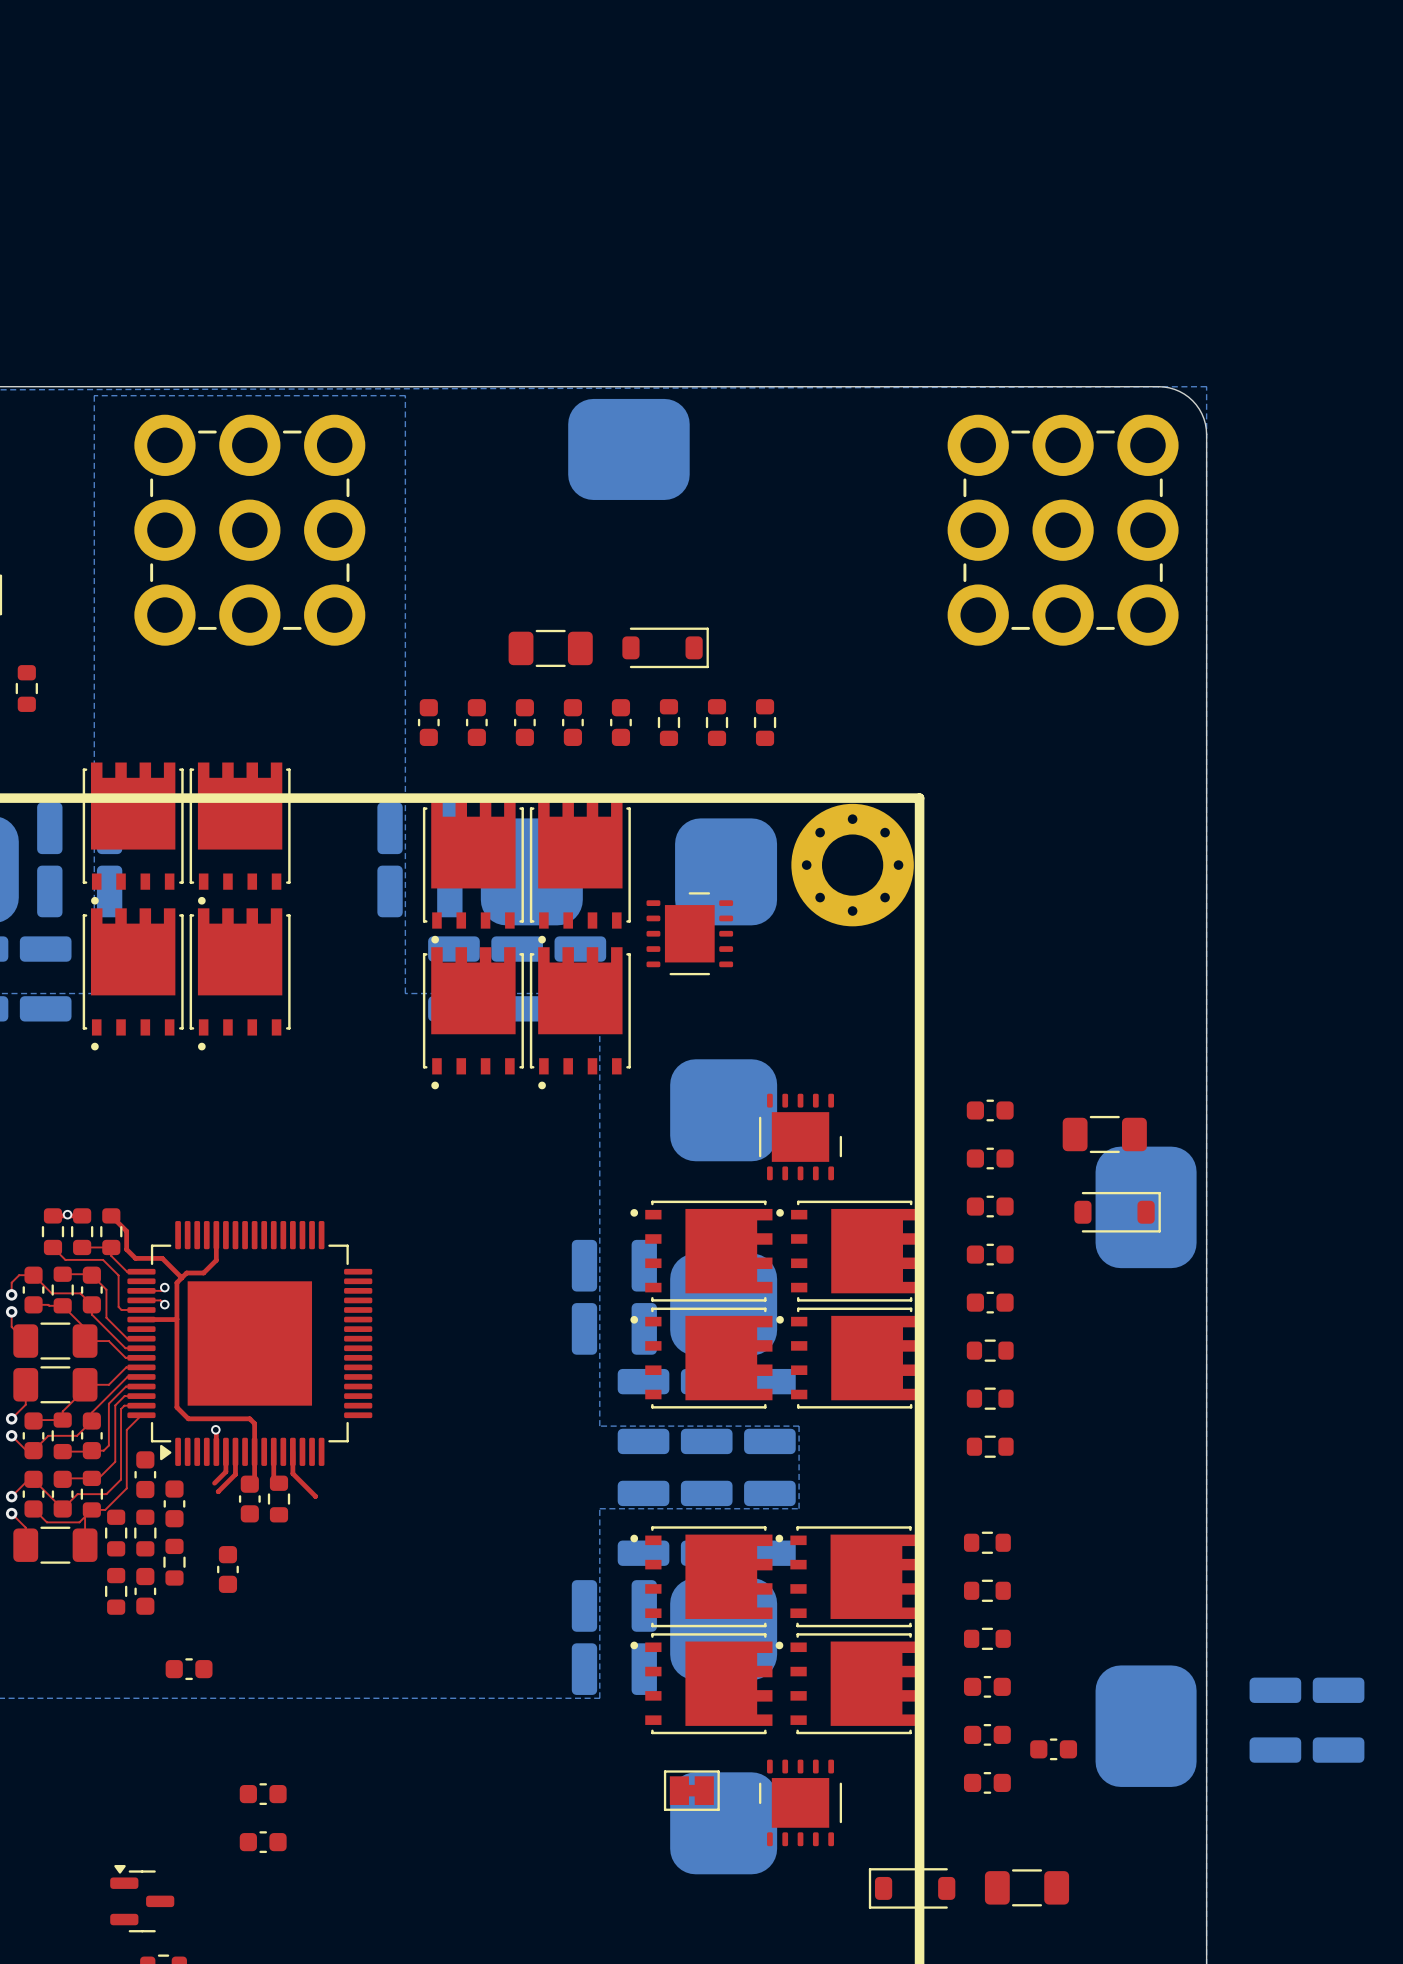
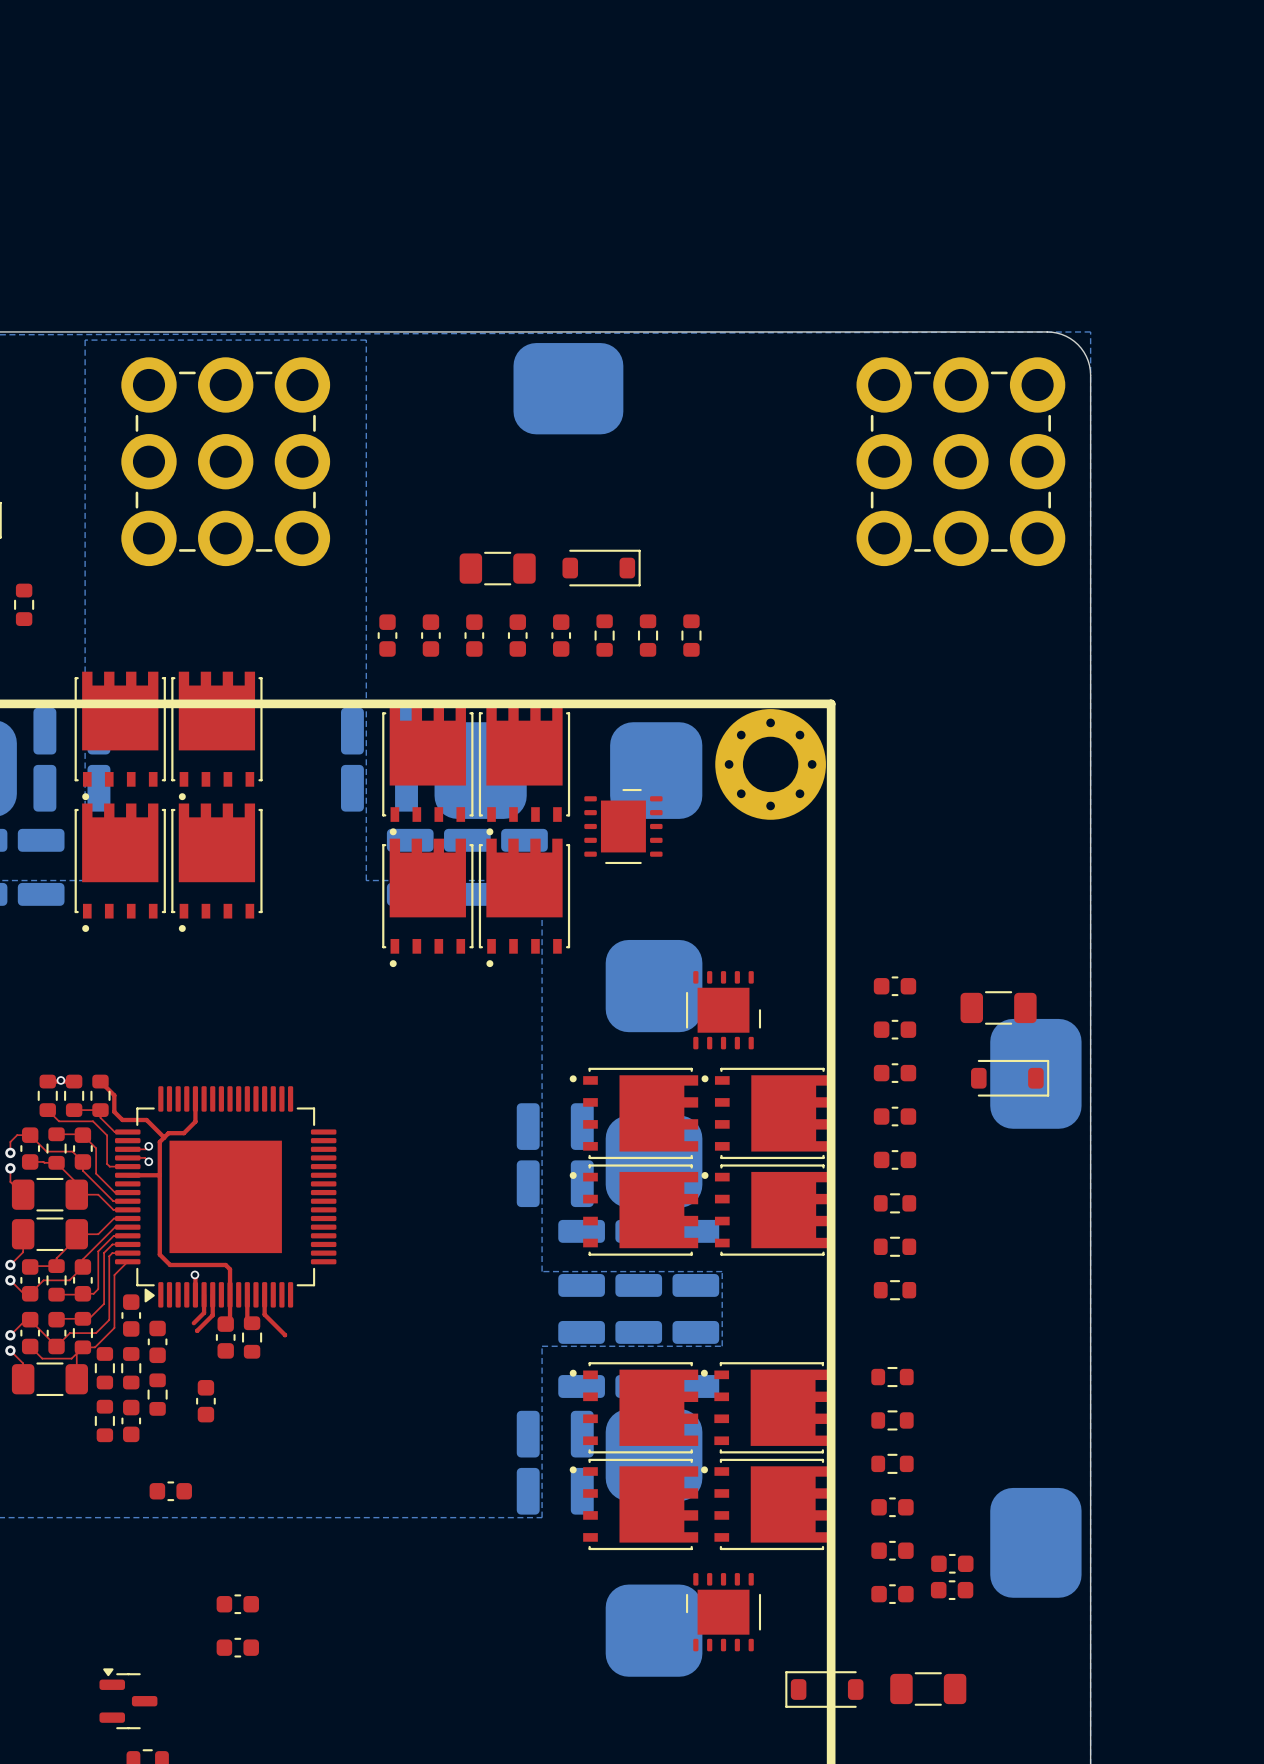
part: (1275, 1720) -> none
part: (1338, 1720) -> none
part: none -> (952, 1590)
part: (691, 1790) -> none

